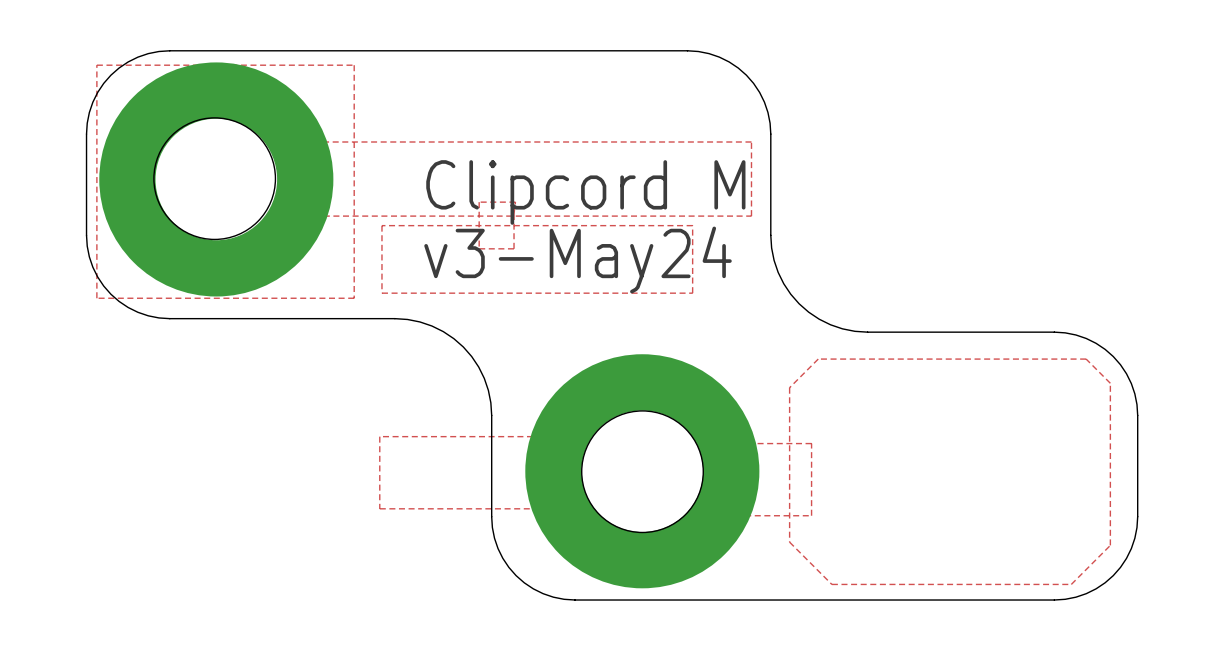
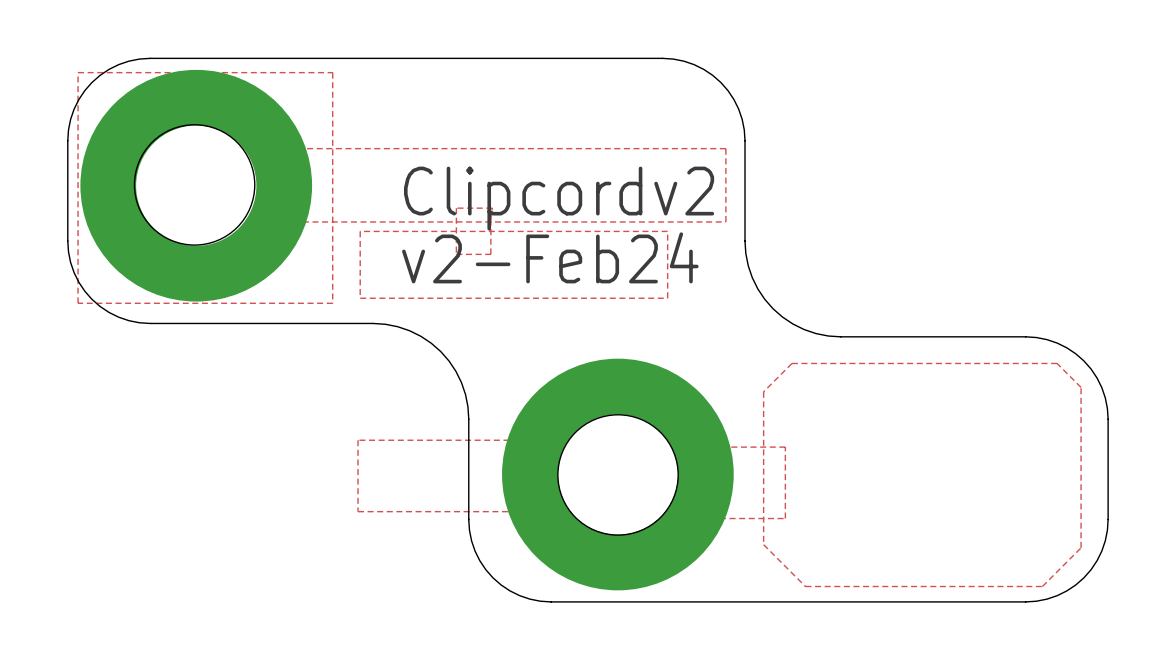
text: Clipcord M (585, 192) -> Clipcordv2 (559, 198)
text: v3-May24 (578, 260) -> v2-Feb24 (550, 257)

